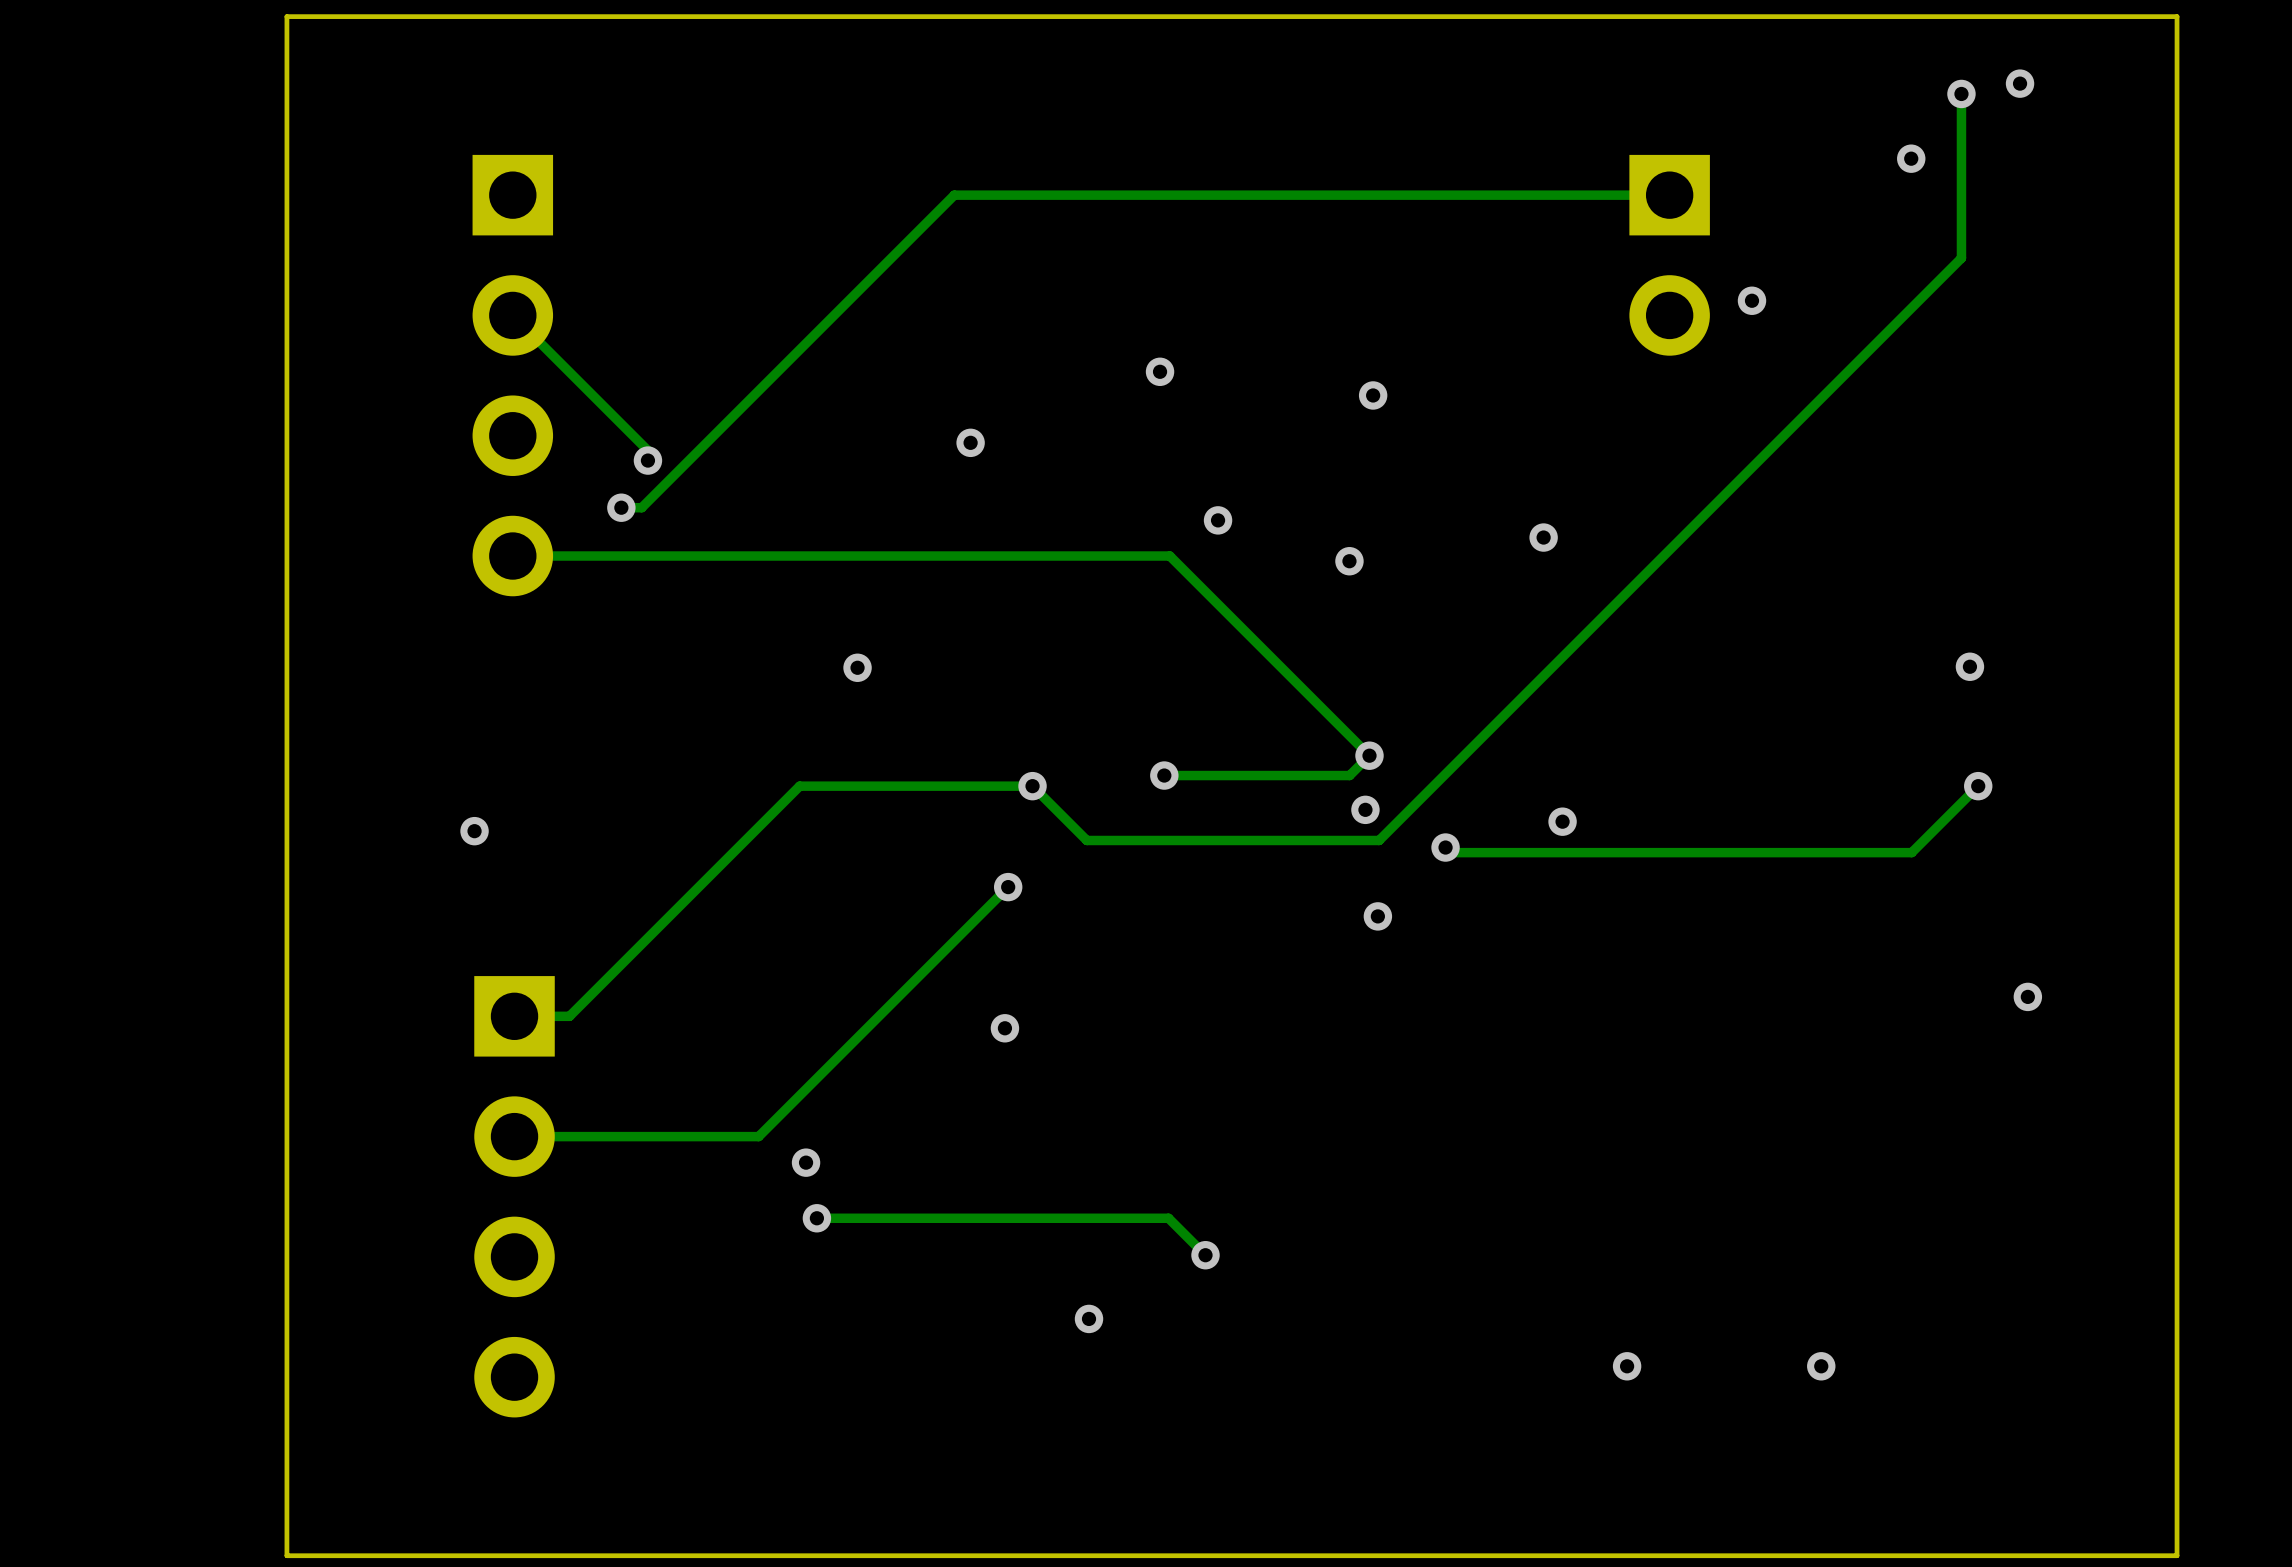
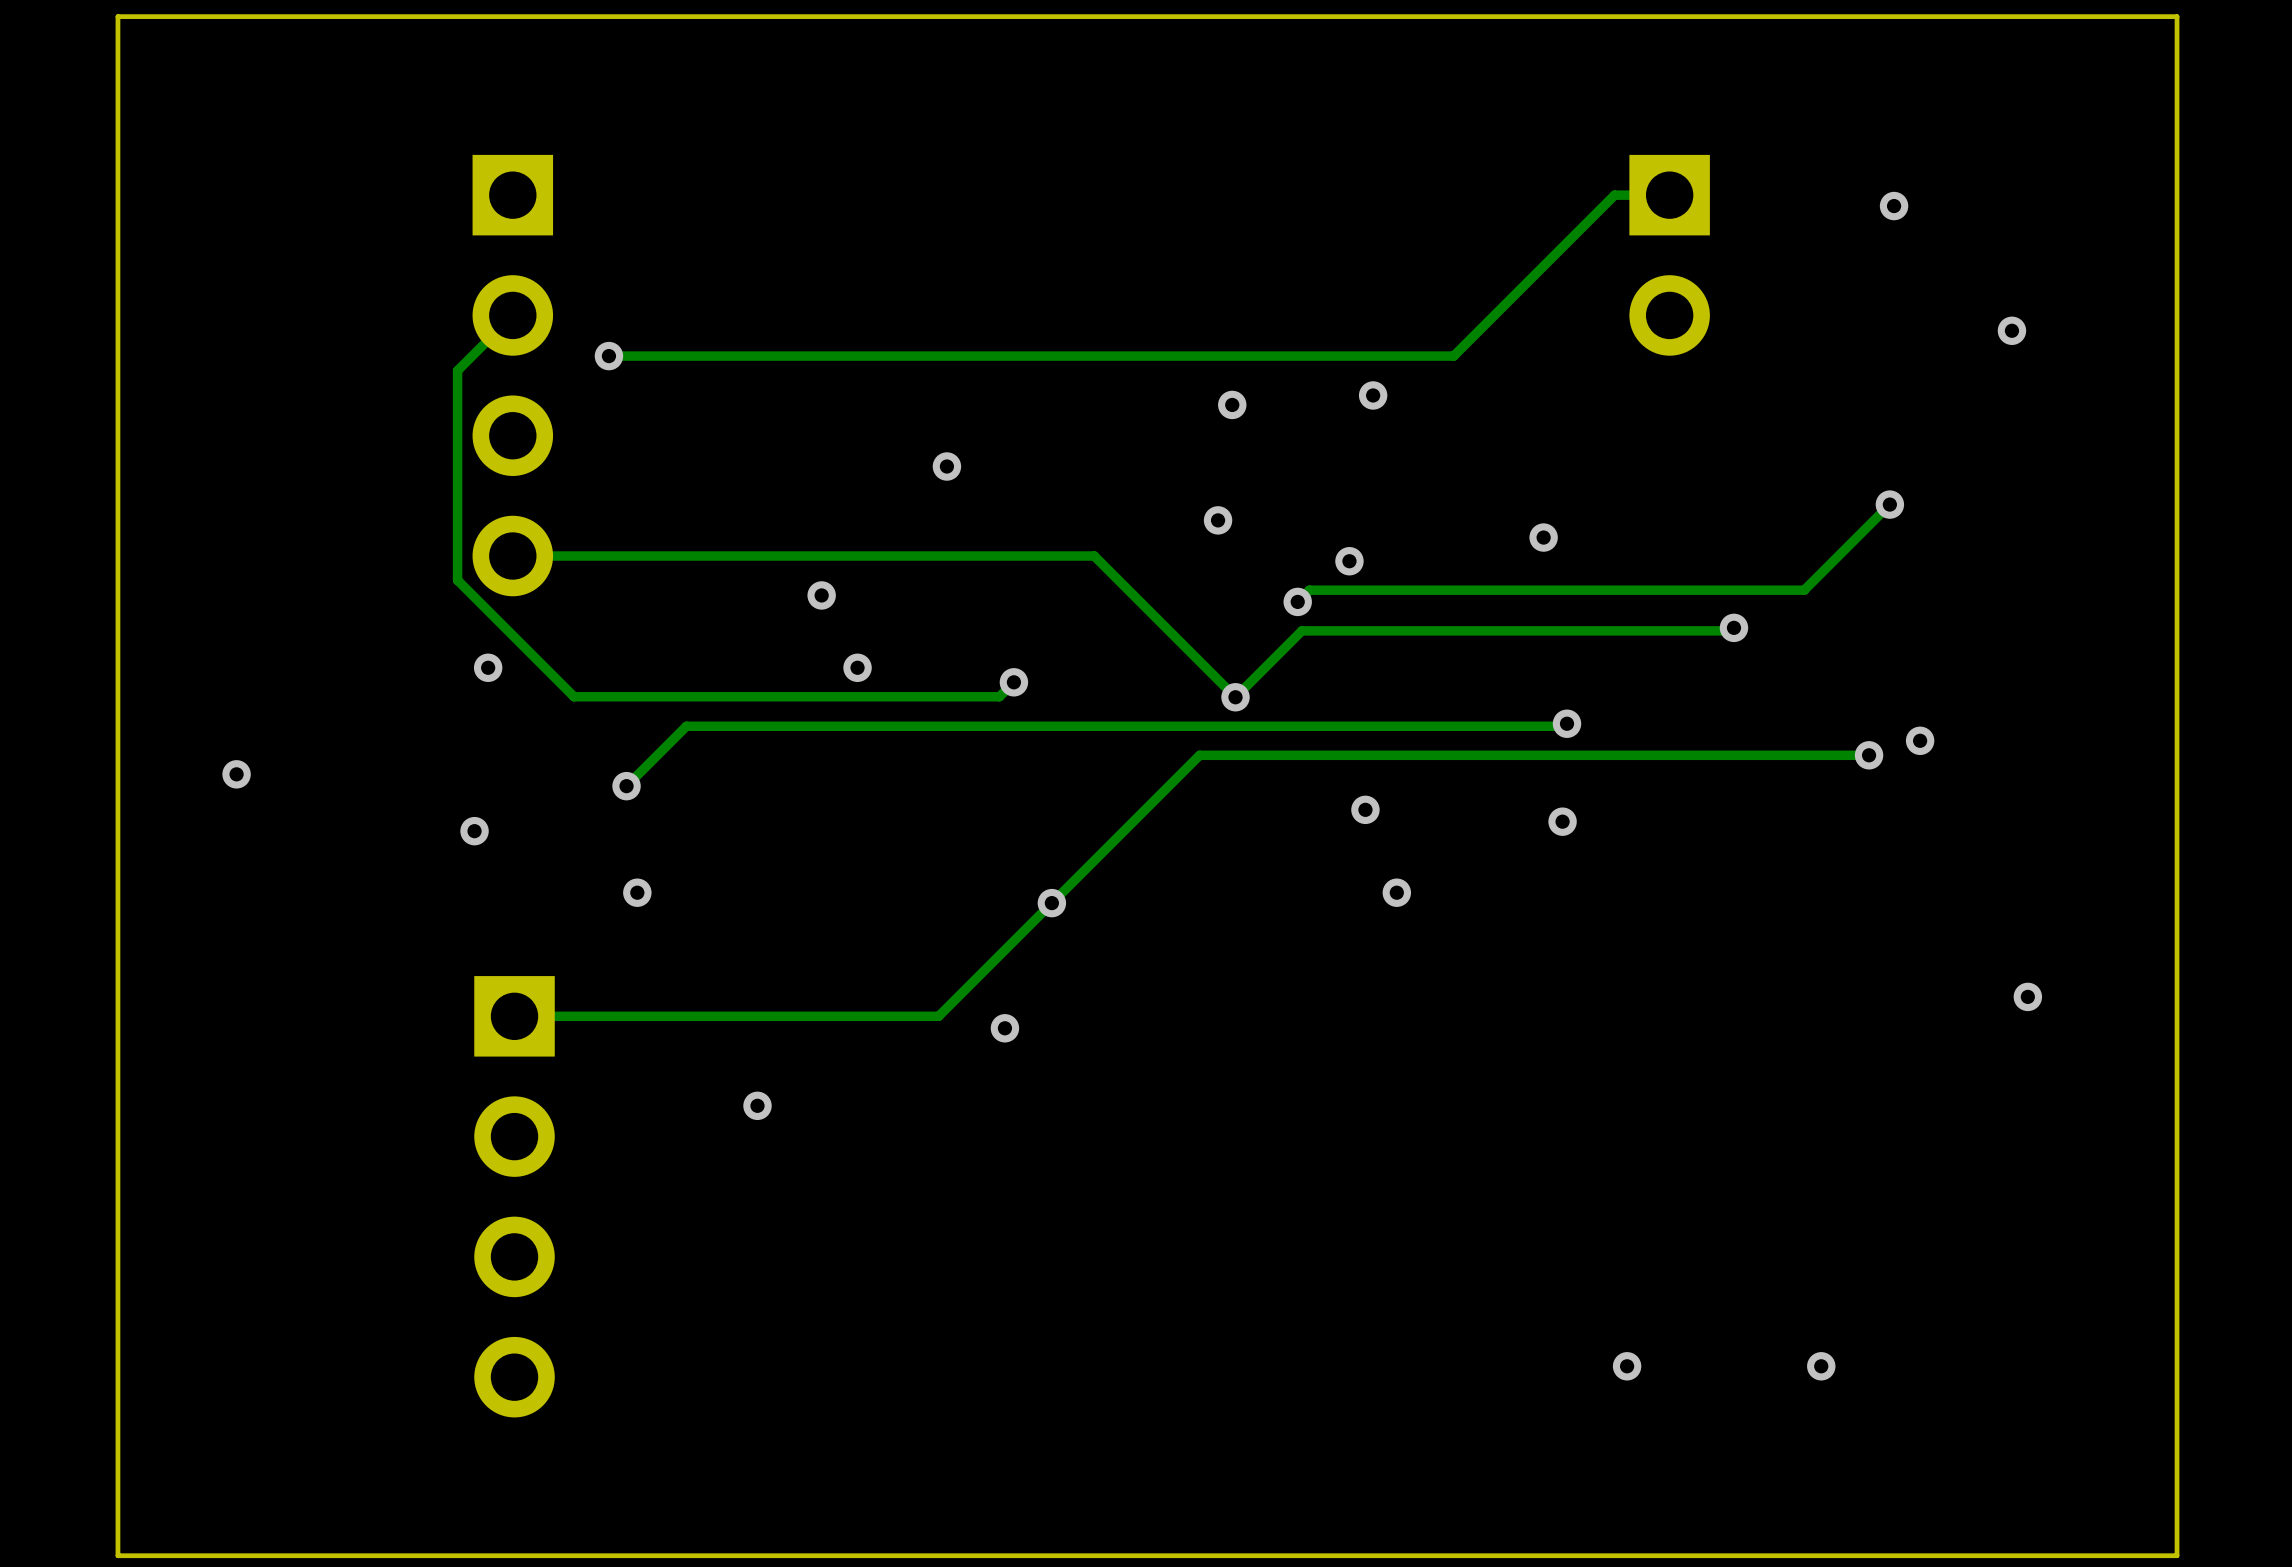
board edge: (286, 16) (286, 1555) -> (286, 16) (117, 16) (117, 1555) (286, 1555)
via: (2020, 83) -> none
track: (1961, 93) (1961, 258) (1379, 840) (1086, 840) (1032, 786) (799, 786) (569, 1016) -> (1869, 755) (1199, 755) (938, 1016) (569, 1016)
via: (1961, 93) -> none
via position: (1911, 158) -> (1894, 206)
track: (1614, 195) (954, 195) (641, 507) (621, 507) -> (1614, 195) (1453, 356) (608, 356)
via: (1752, 300) -> none
track: (512, 315) (647, 450) (647, 460) -> (512, 315) (457, 370) (457, 580) (574, 696) (999, 696) (1013, 682)
via: none -> (2011, 330)
via: none -> (608, 356)
via position: (1160, 371) -> (1232, 404)
via position: (970, 442) -> (946, 466)
via: (647, 460) -> none
track: none -> (1889, 504) (1804, 590) (1309, 590) (1297, 601)
via: none -> (1889, 504)
via: (621, 507) -> none
track: (1094, 556) (1169, 556) (1369, 755) (1349, 775) (1164, 775) -> (1094, 556) (1235, 697) (1301, 630) (1730, 630) (1733, 627)
via: none -> (821, 595)
via: none -> (1297, 601)
via: none -> (1733, 627)
via: (1969, 666) -> none
via: none -> (488, 667)
via: none -> (1013, 682)
via: none -> (1235, 697)
track: none -> (1567, 723) (1564, 726) (686, 726) (626, 786)
via: none -> (1567, 723)
via: none -> (1920, 740)
via: (1369, 755) -> none
via: none -> (1869, 755)
via: none -> (236, 774)
via: (1164, 775) -> none
via: none -> (626, 786)
via: (1032, 786) -> none
track: (1978, 786) (1911, 852) (1450, 852) (1445, 847) -> none
via: (1978, 786) -> none
via: (1445, 847) -> none
track: (1008, 887) (758, 1136) (514, 1136) -> none
via position: (1008, 887) -> (1051, 903)
via: none -> (637, 892)
via position: (1377, 916) -> (1396, 892)
via: none -> (757, 1105)
via: (806, 1162) -> none
track: (816, 1218) (1168, 1218) (1205, 1255) -> none
via: (816, 1218) -> none
via: (1205, 1255) -> none
via: (1089, 1318) -> none

